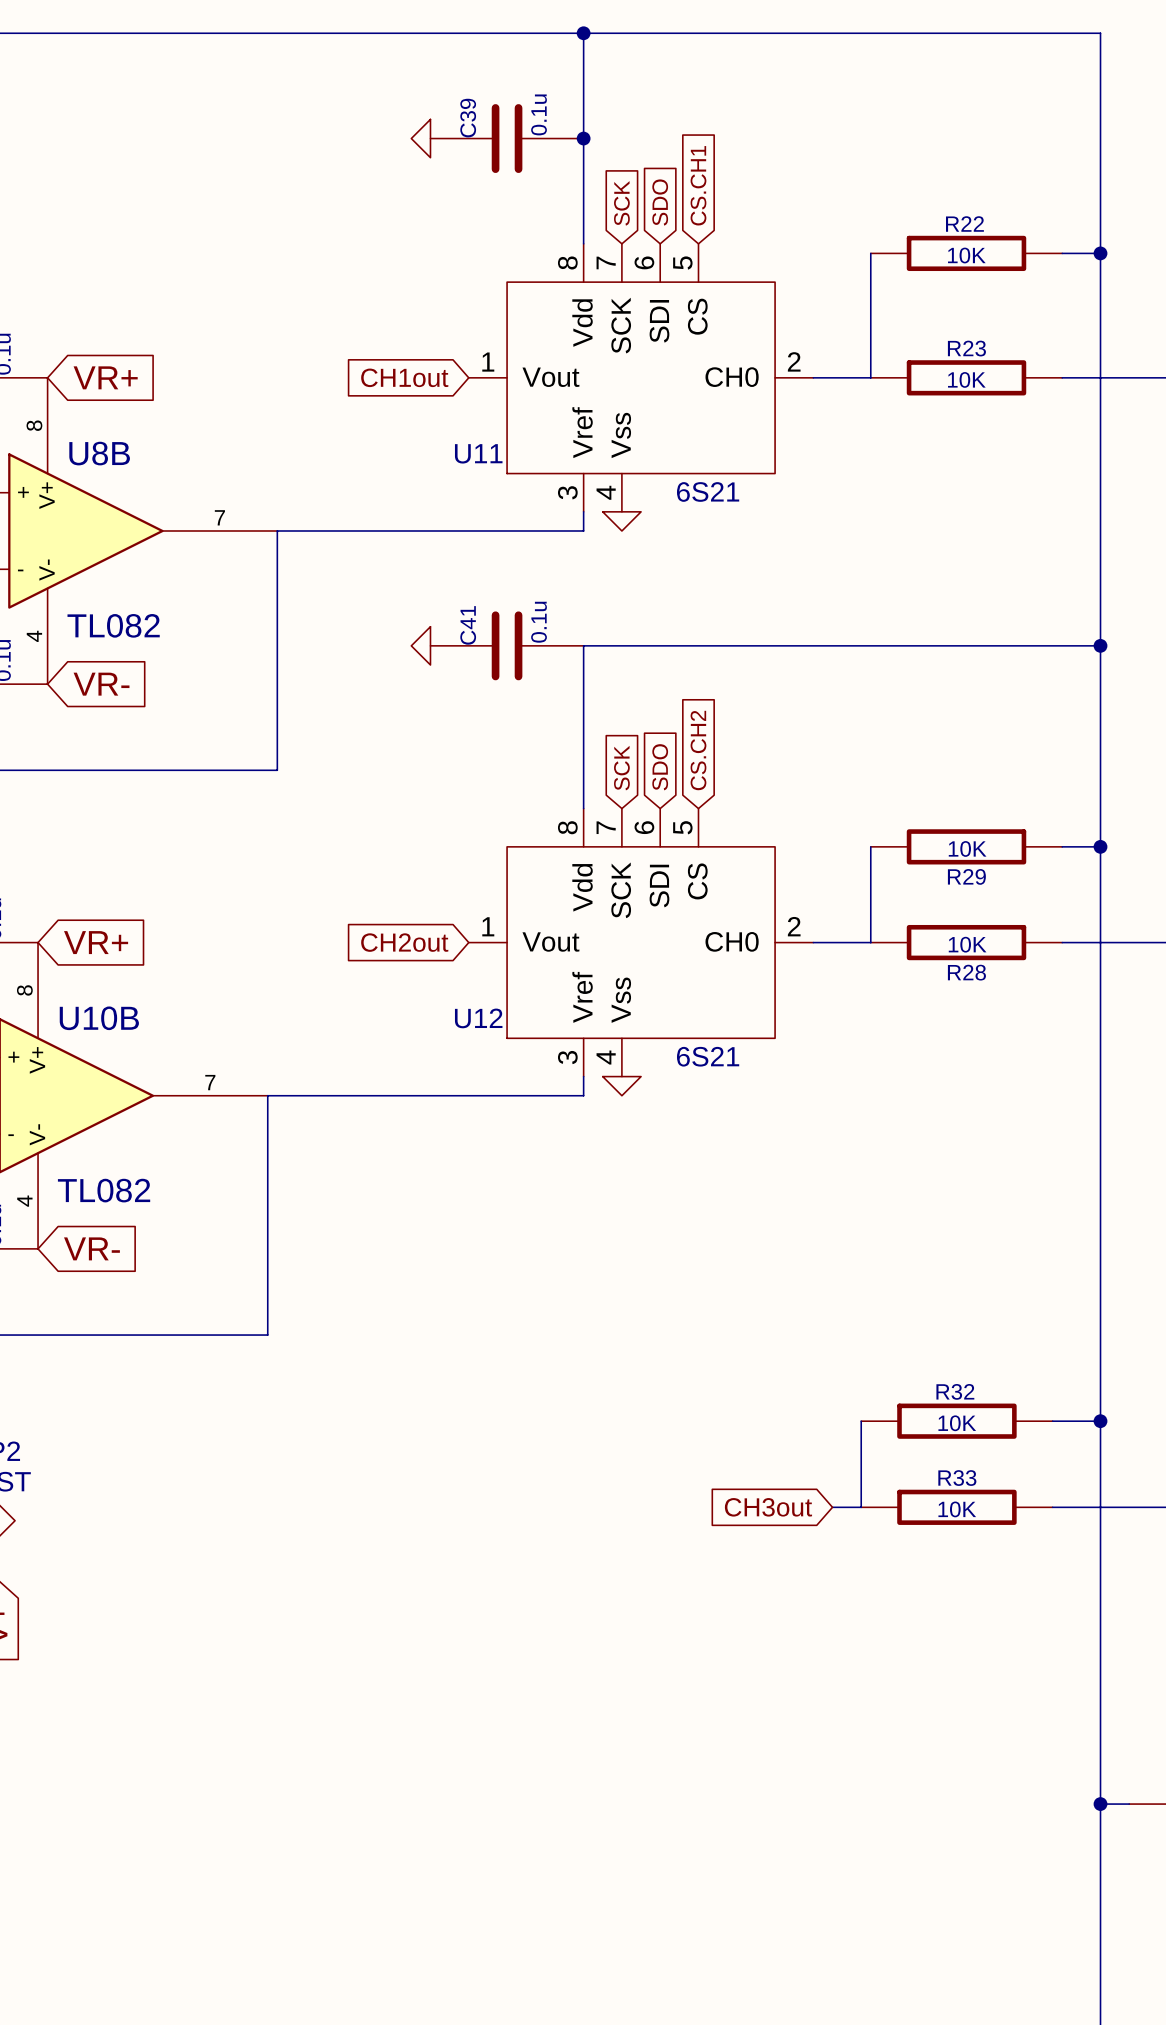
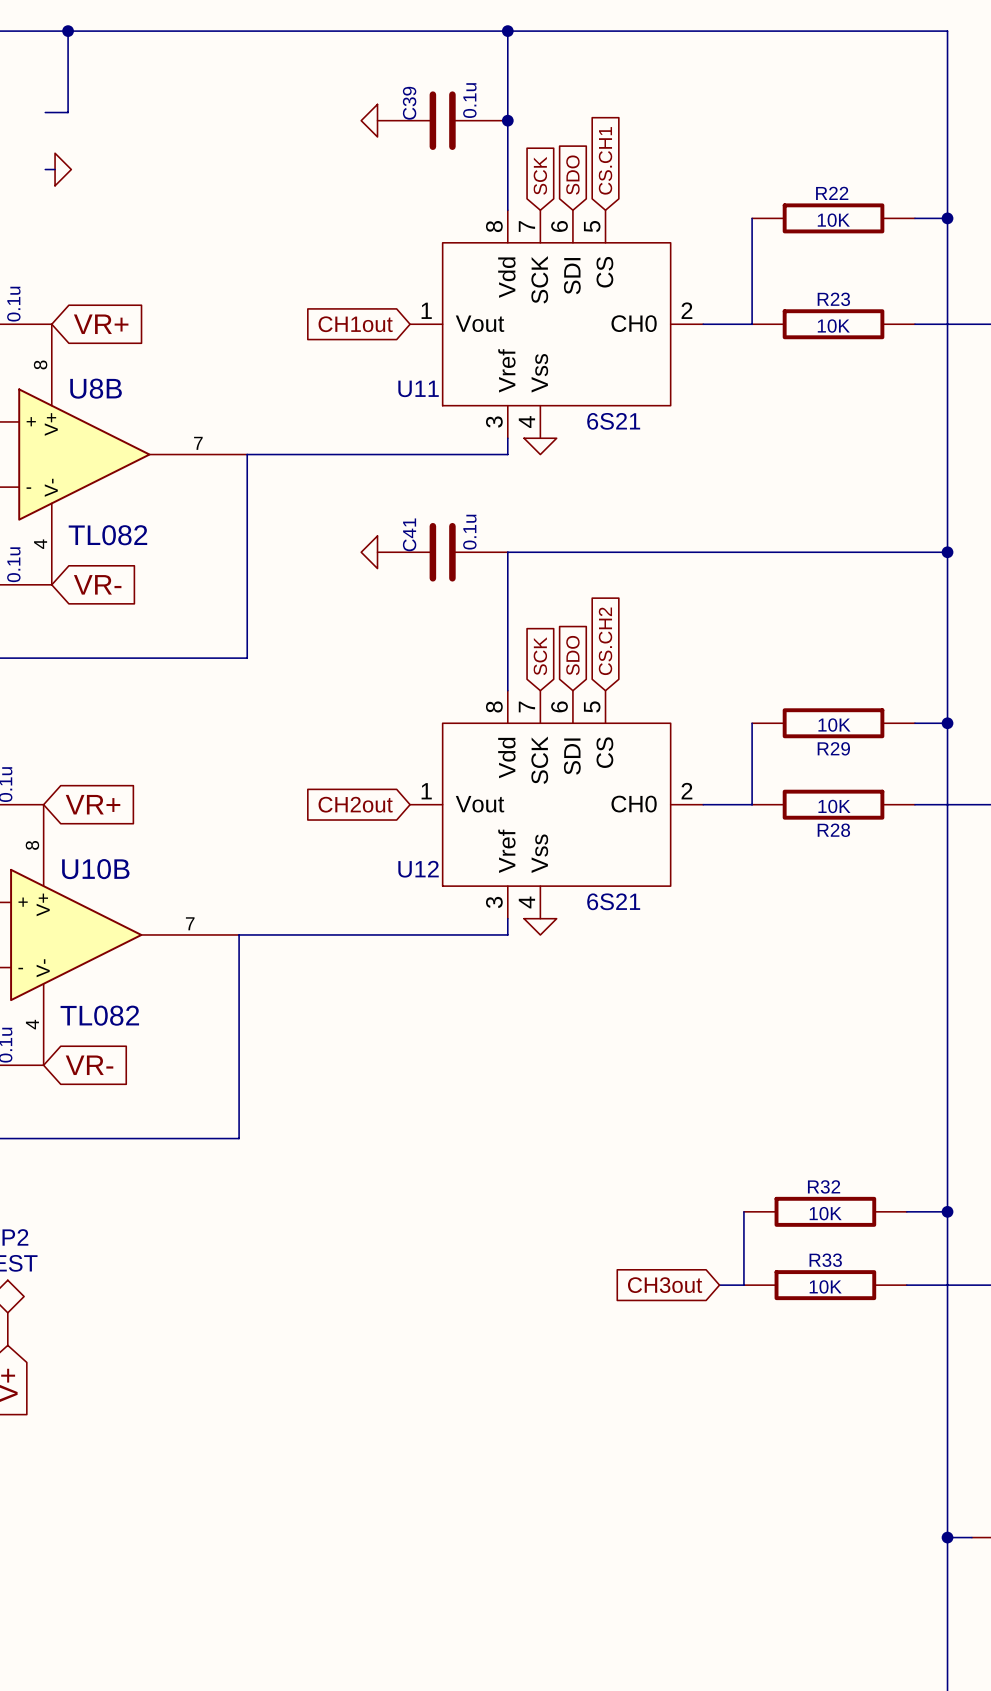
wire: none -> (68, 31) (68, 112) (45, 112)
junction: none -> (68, 31)
wire: none -> (45, 169) (55, 169)
power symbol: none -> (63, 169)

